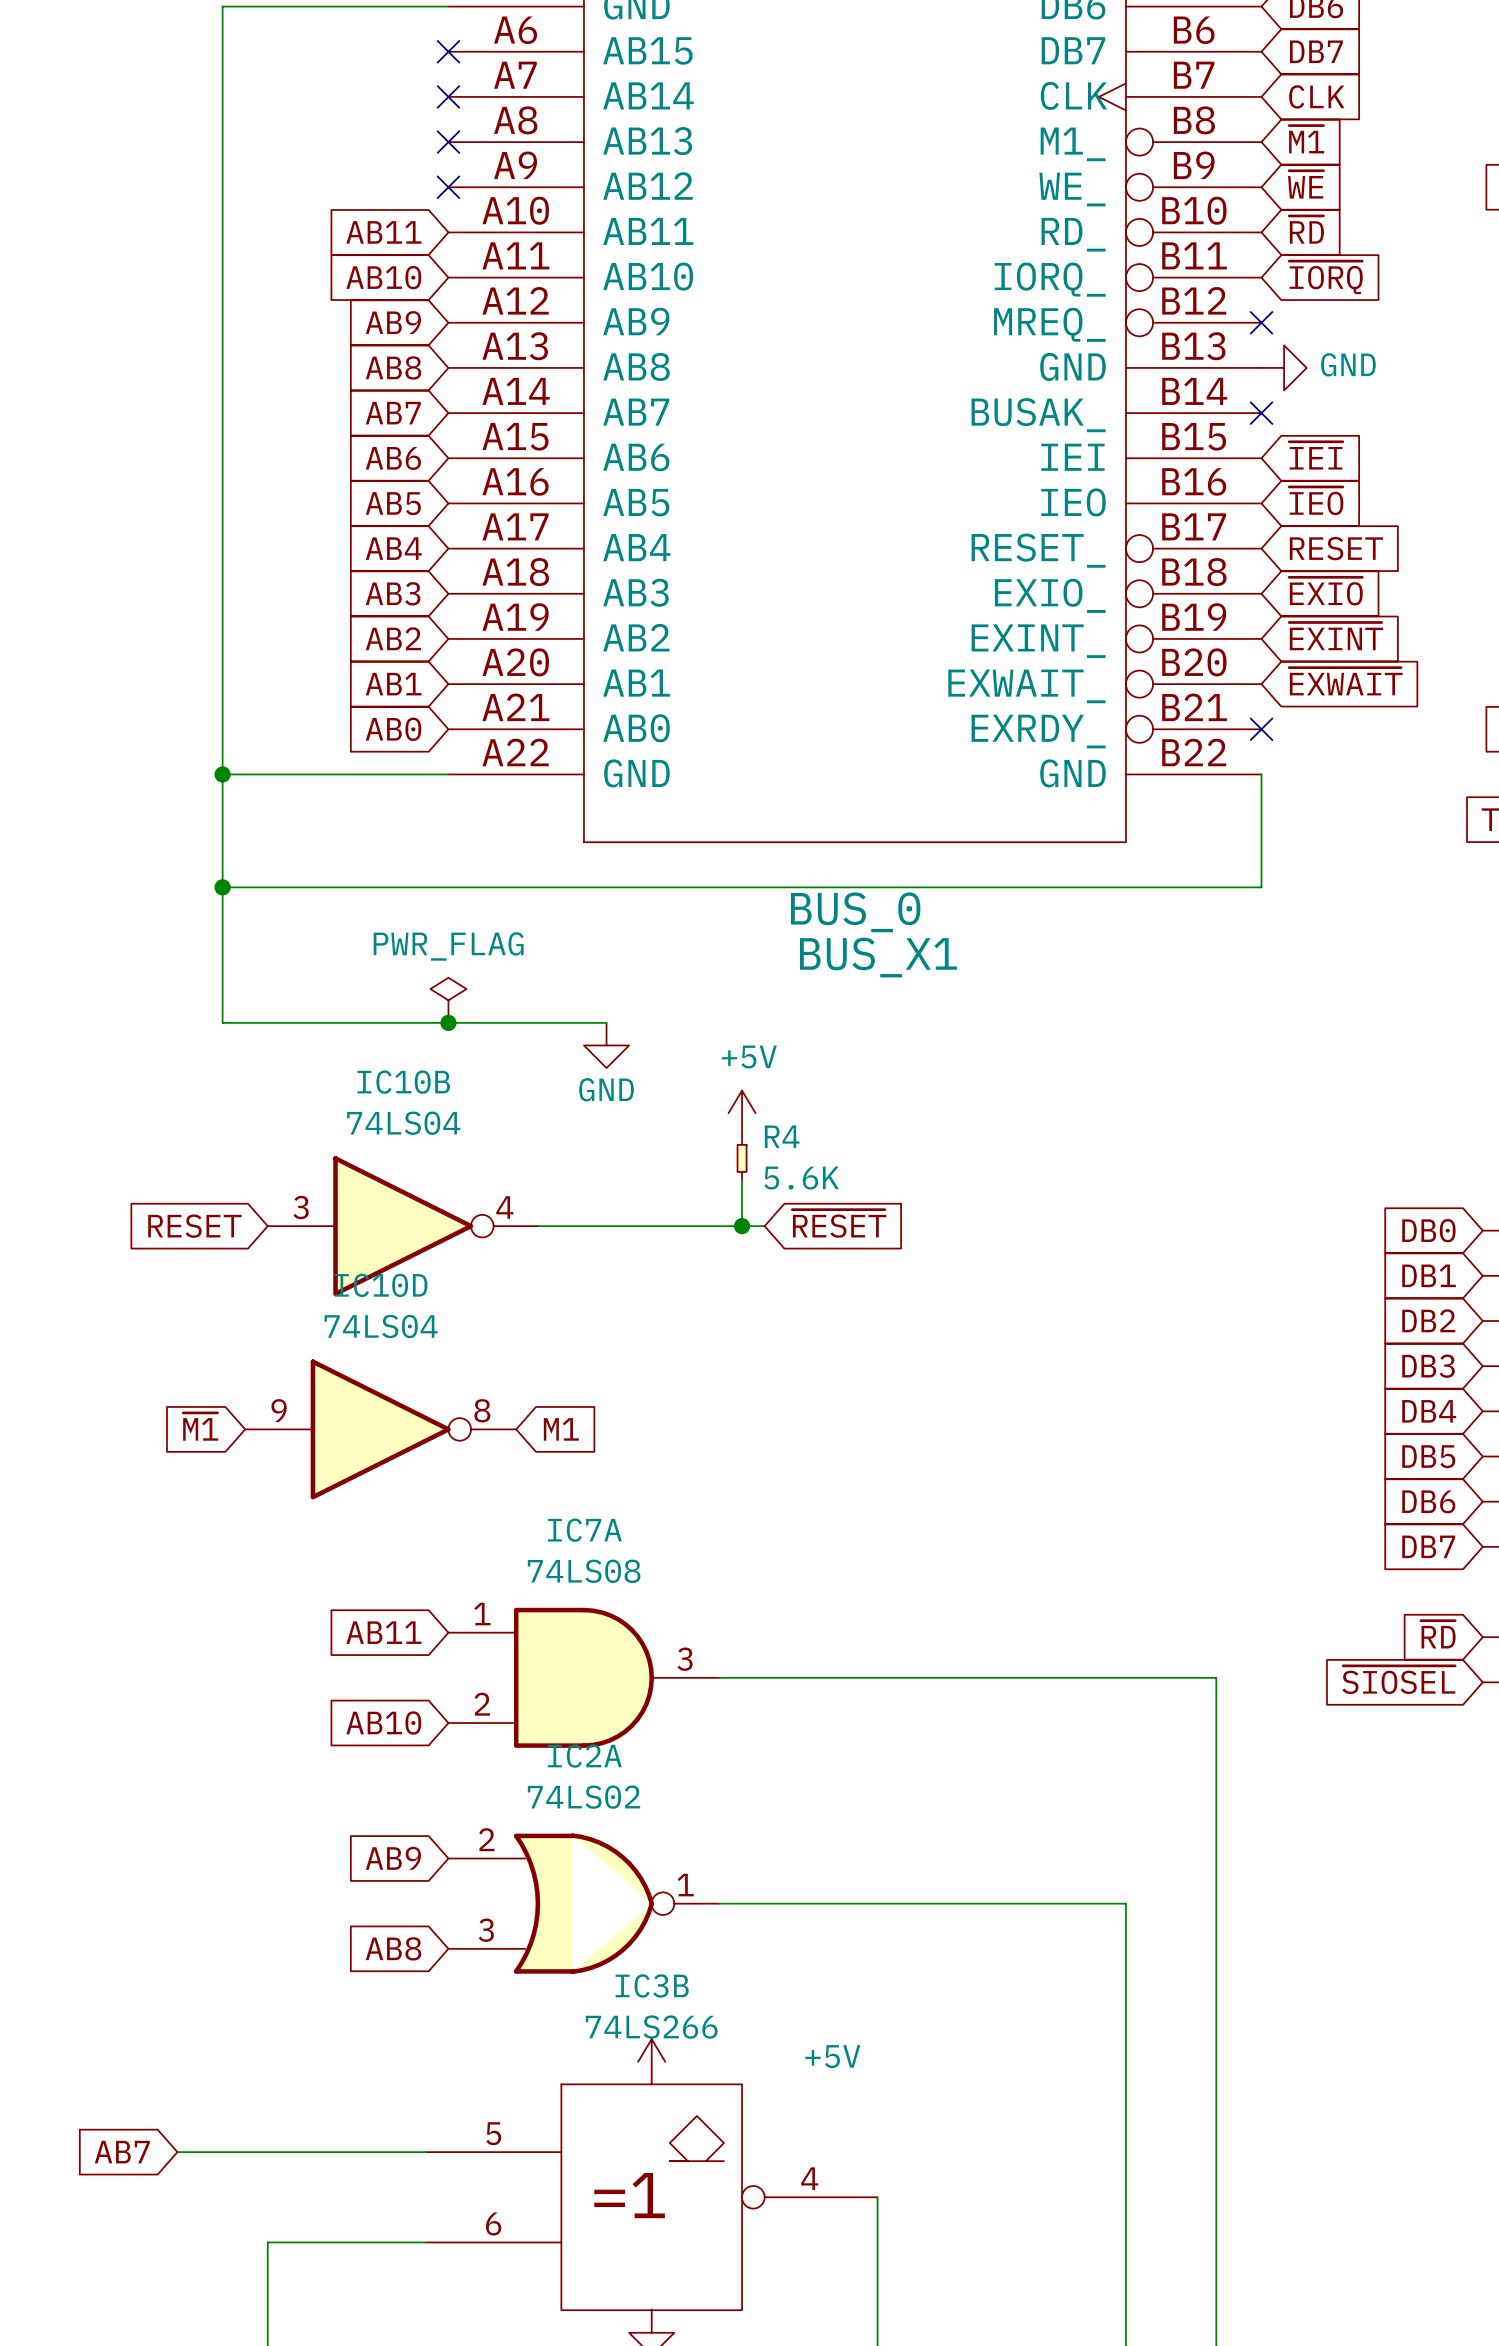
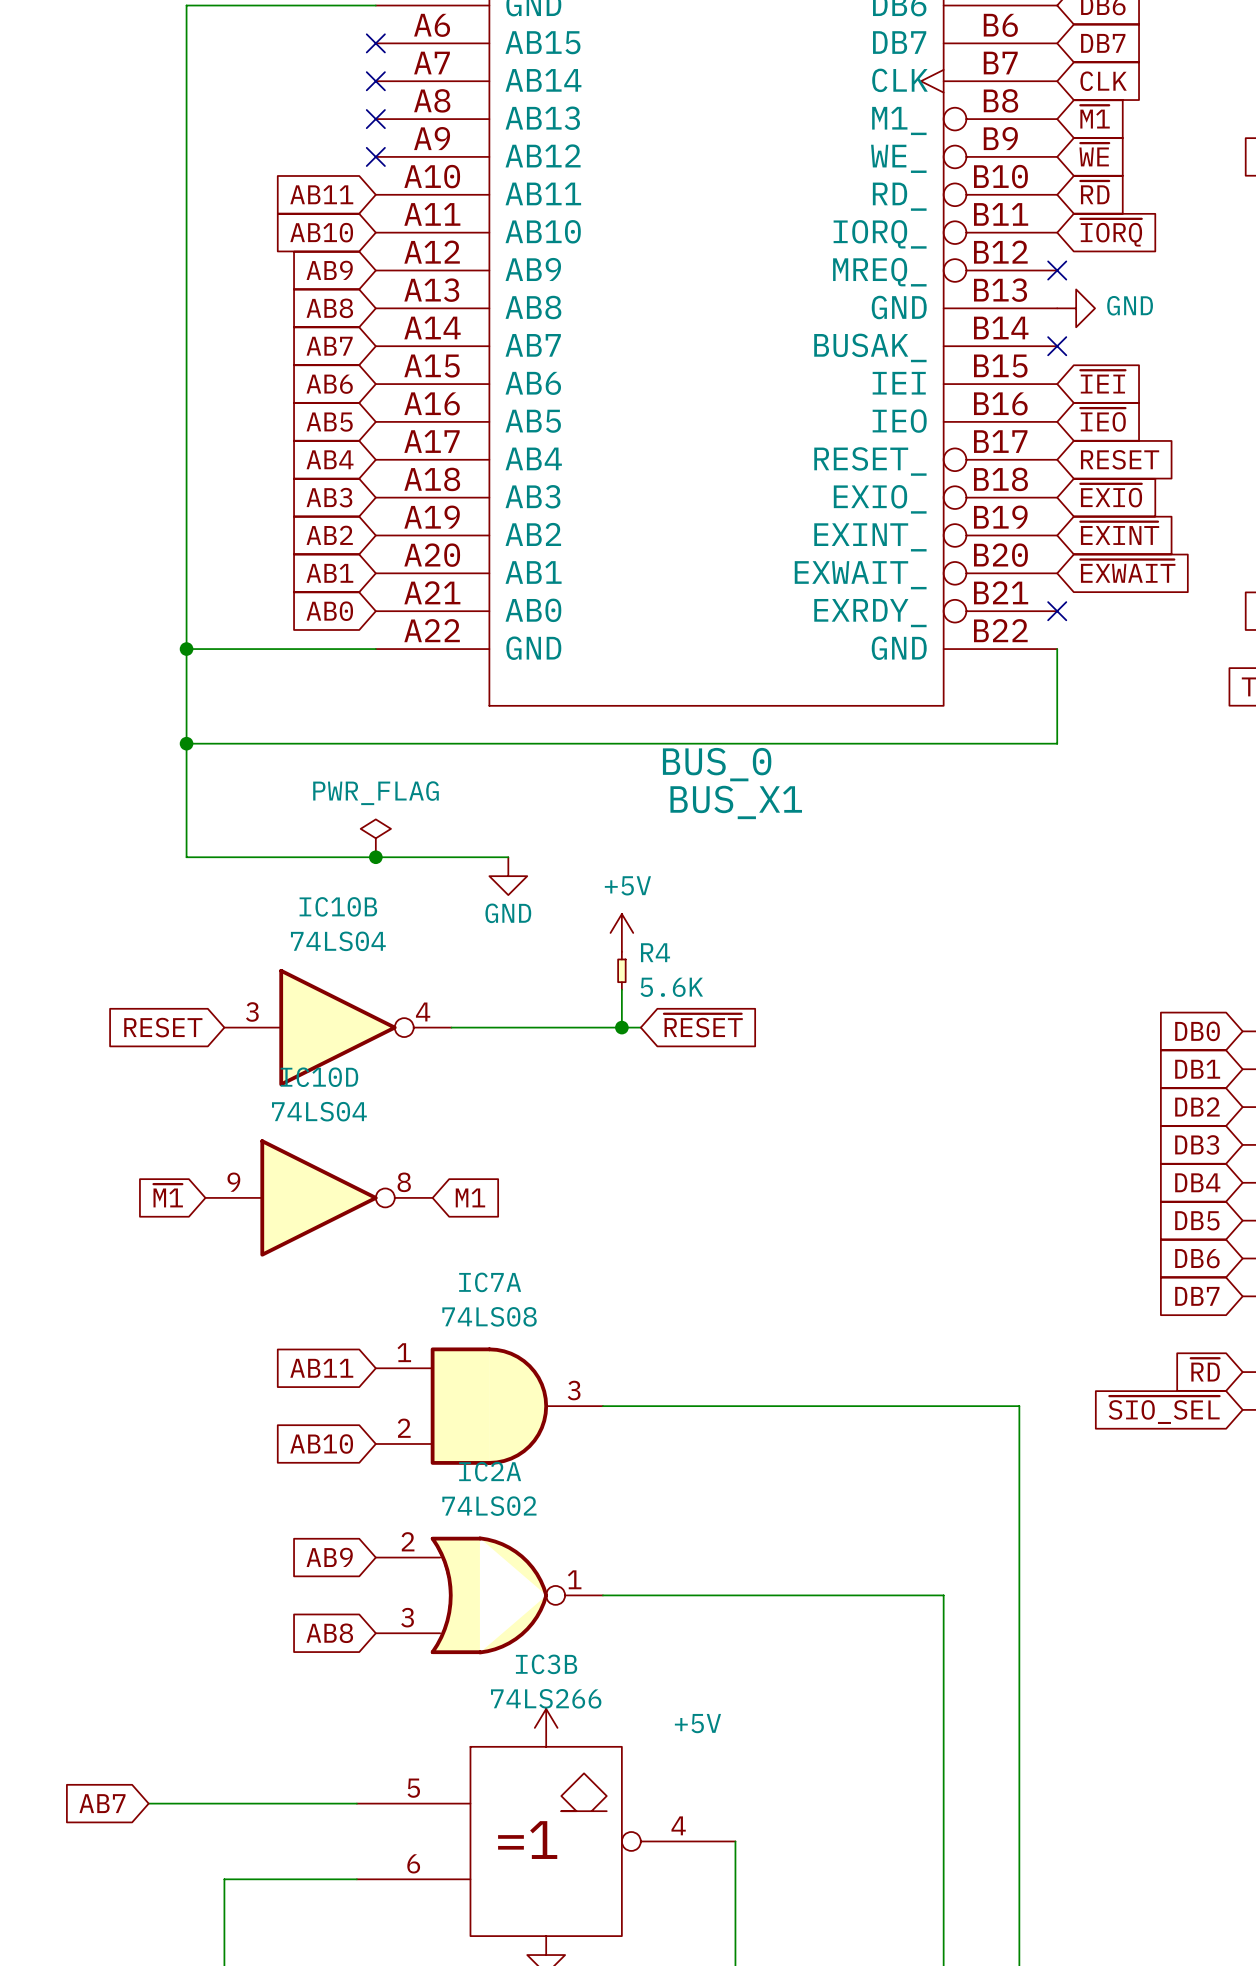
global label: ~{SIOSEL} (1398, 1679) -> ~{SIO_SEL} (1164, 1410)

